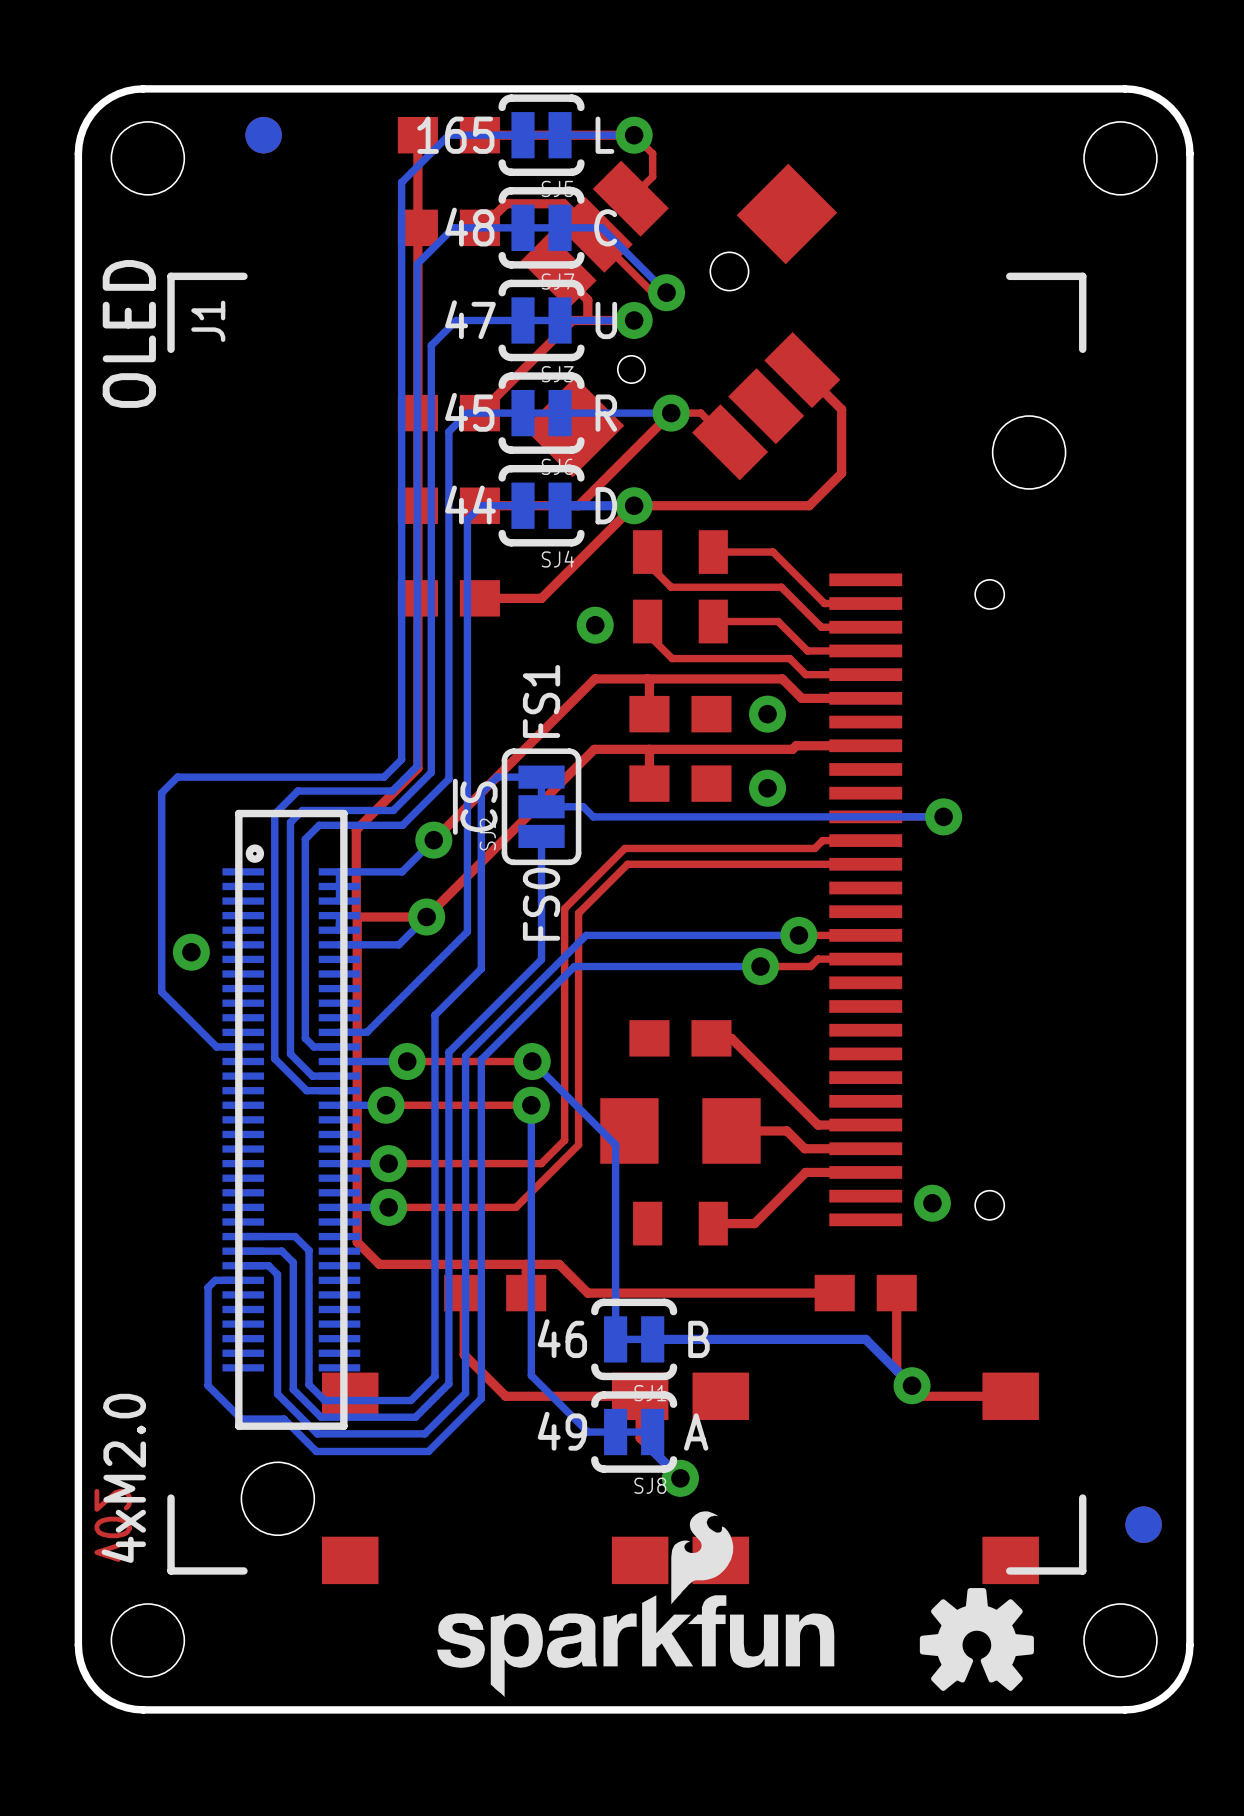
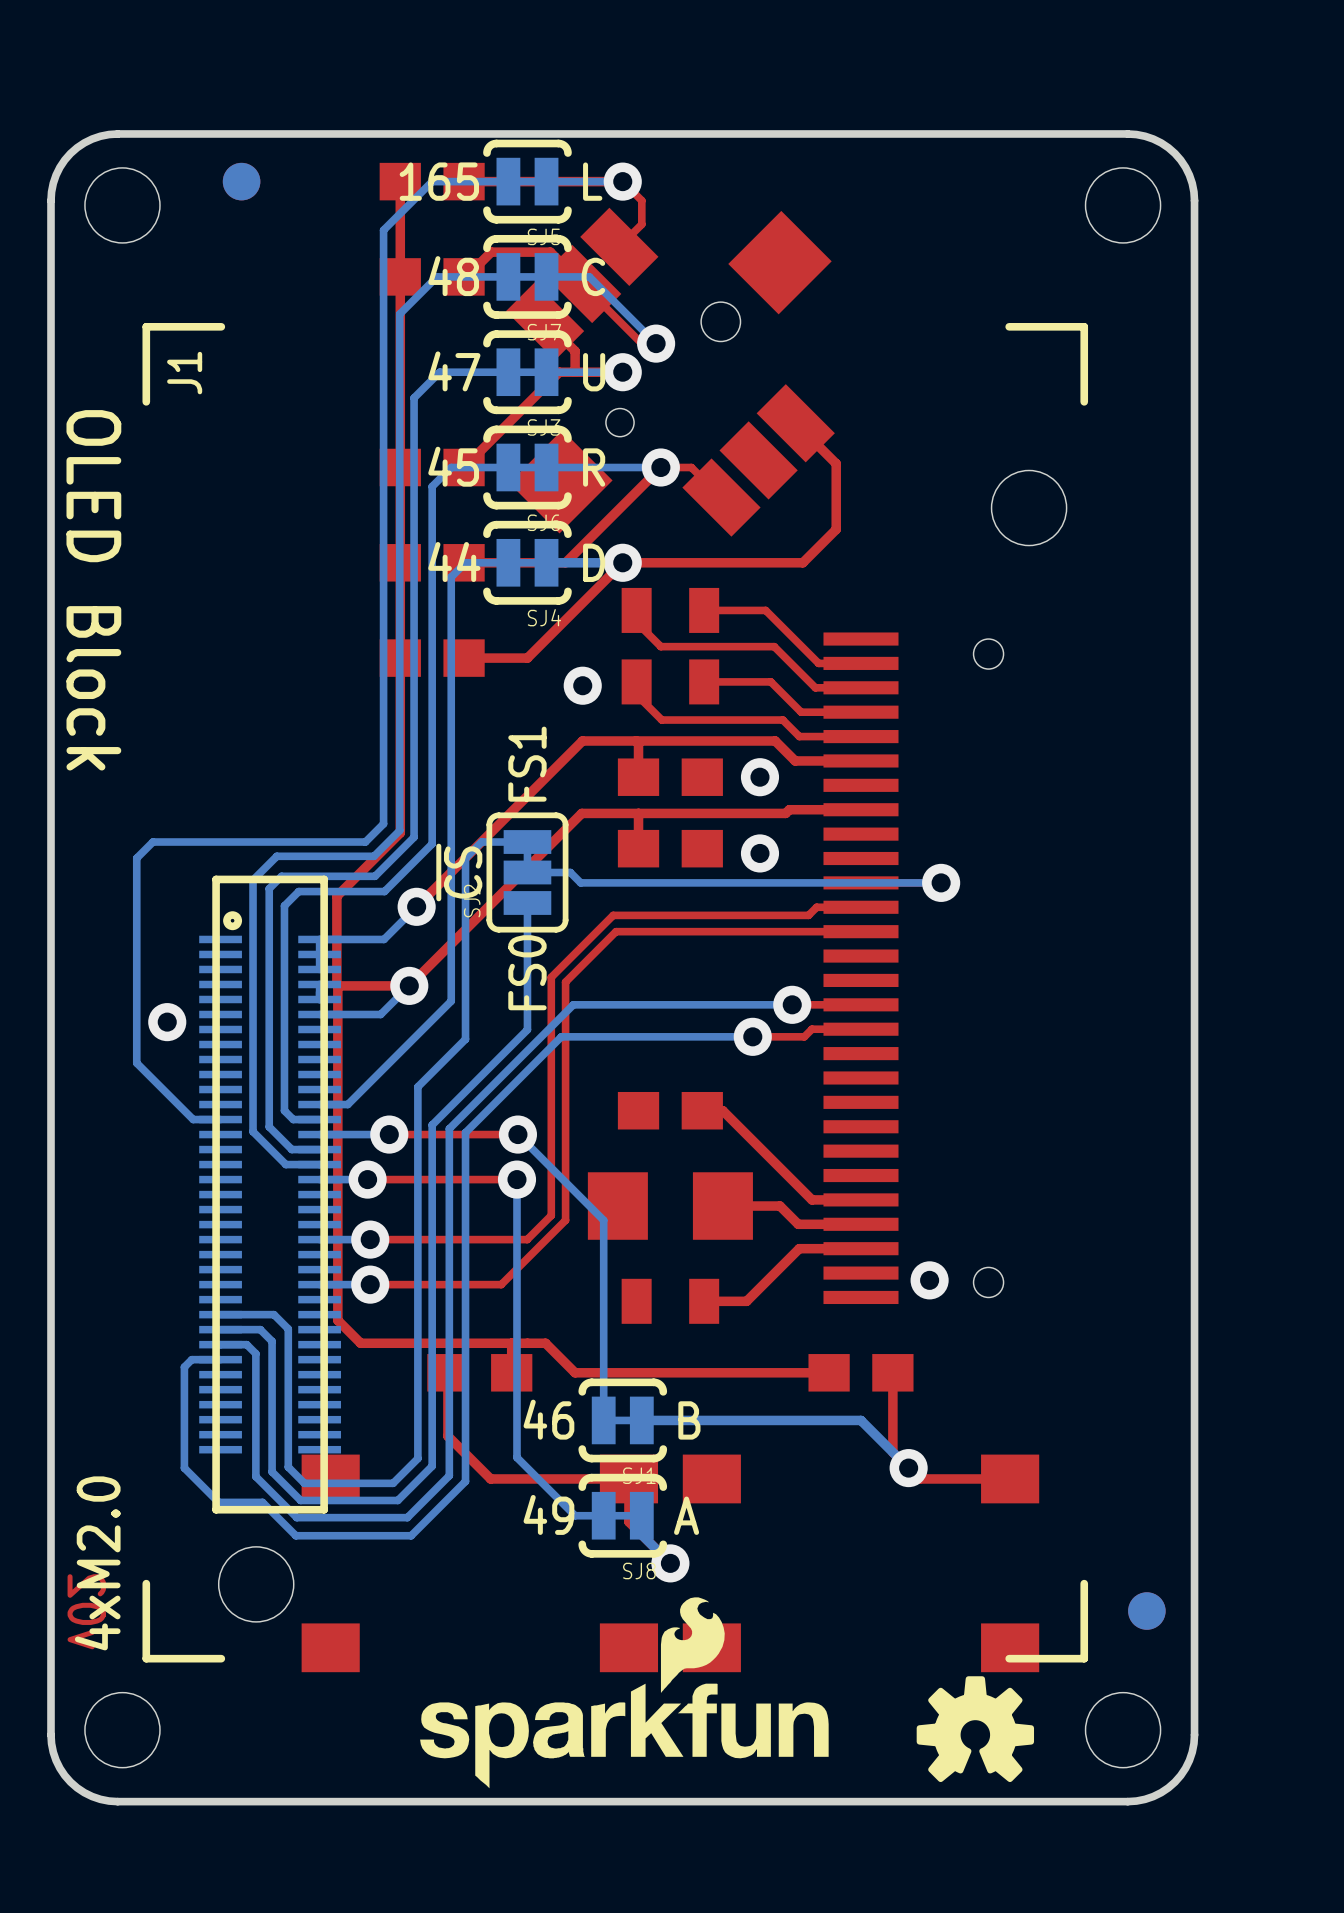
text: OLED (129, 333) -> none
text: none -> OLED Block (93, 590)

